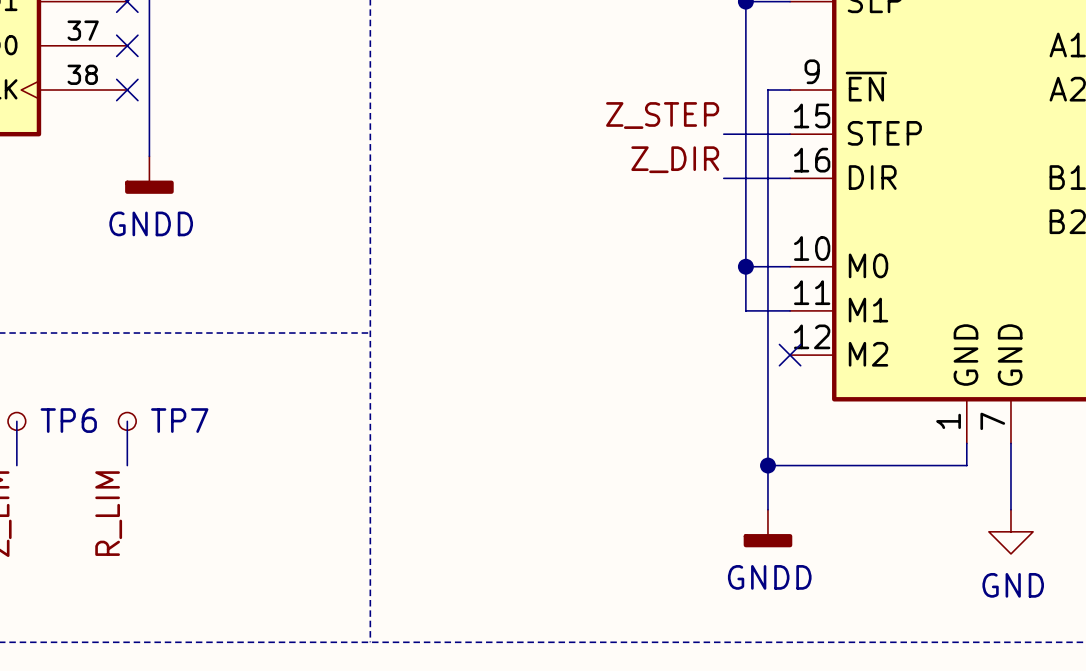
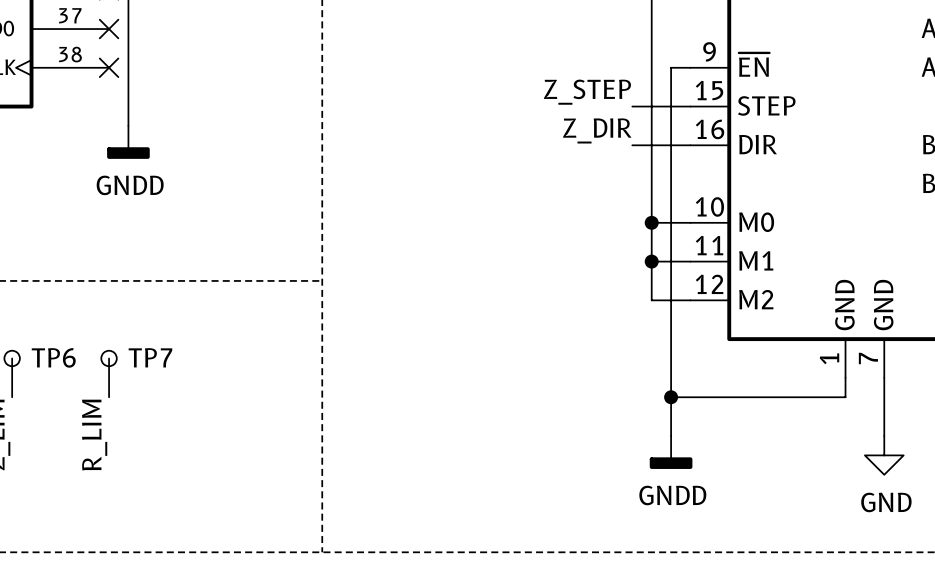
wire: none -> (651, 261) (651, 300) (690, 300)
junction: none -> (651, 261)
no-connect mark: (790, 355) -> none

